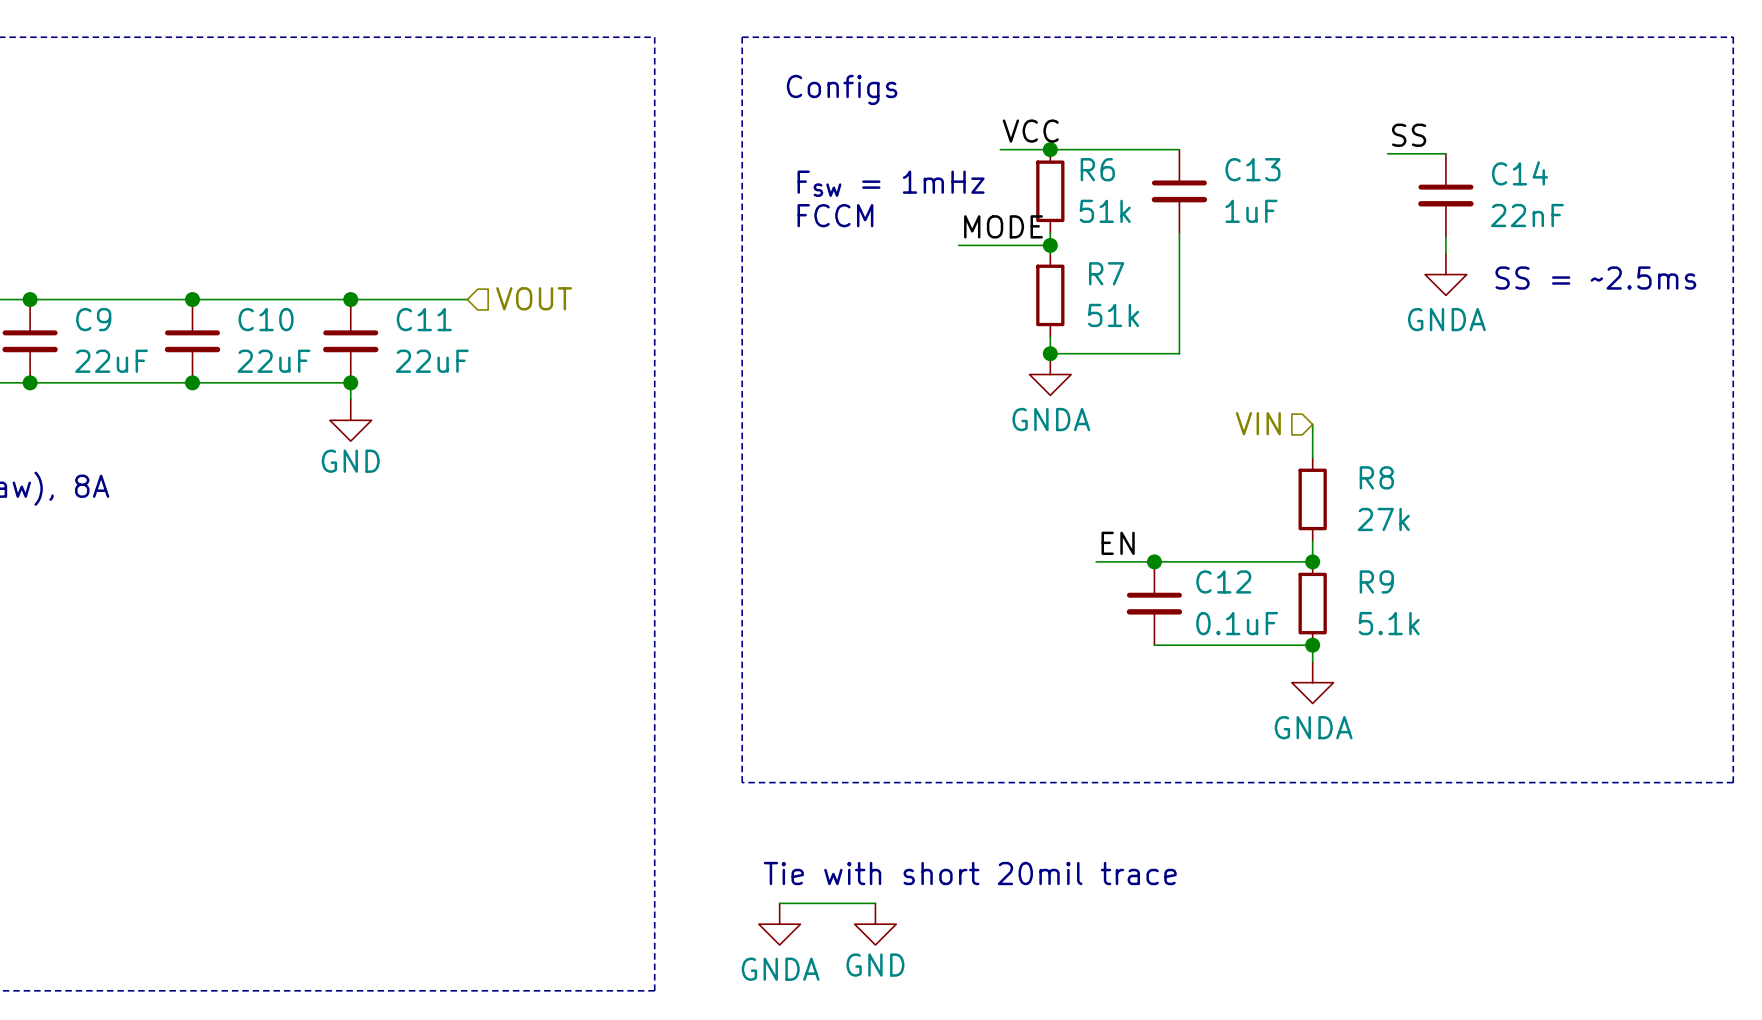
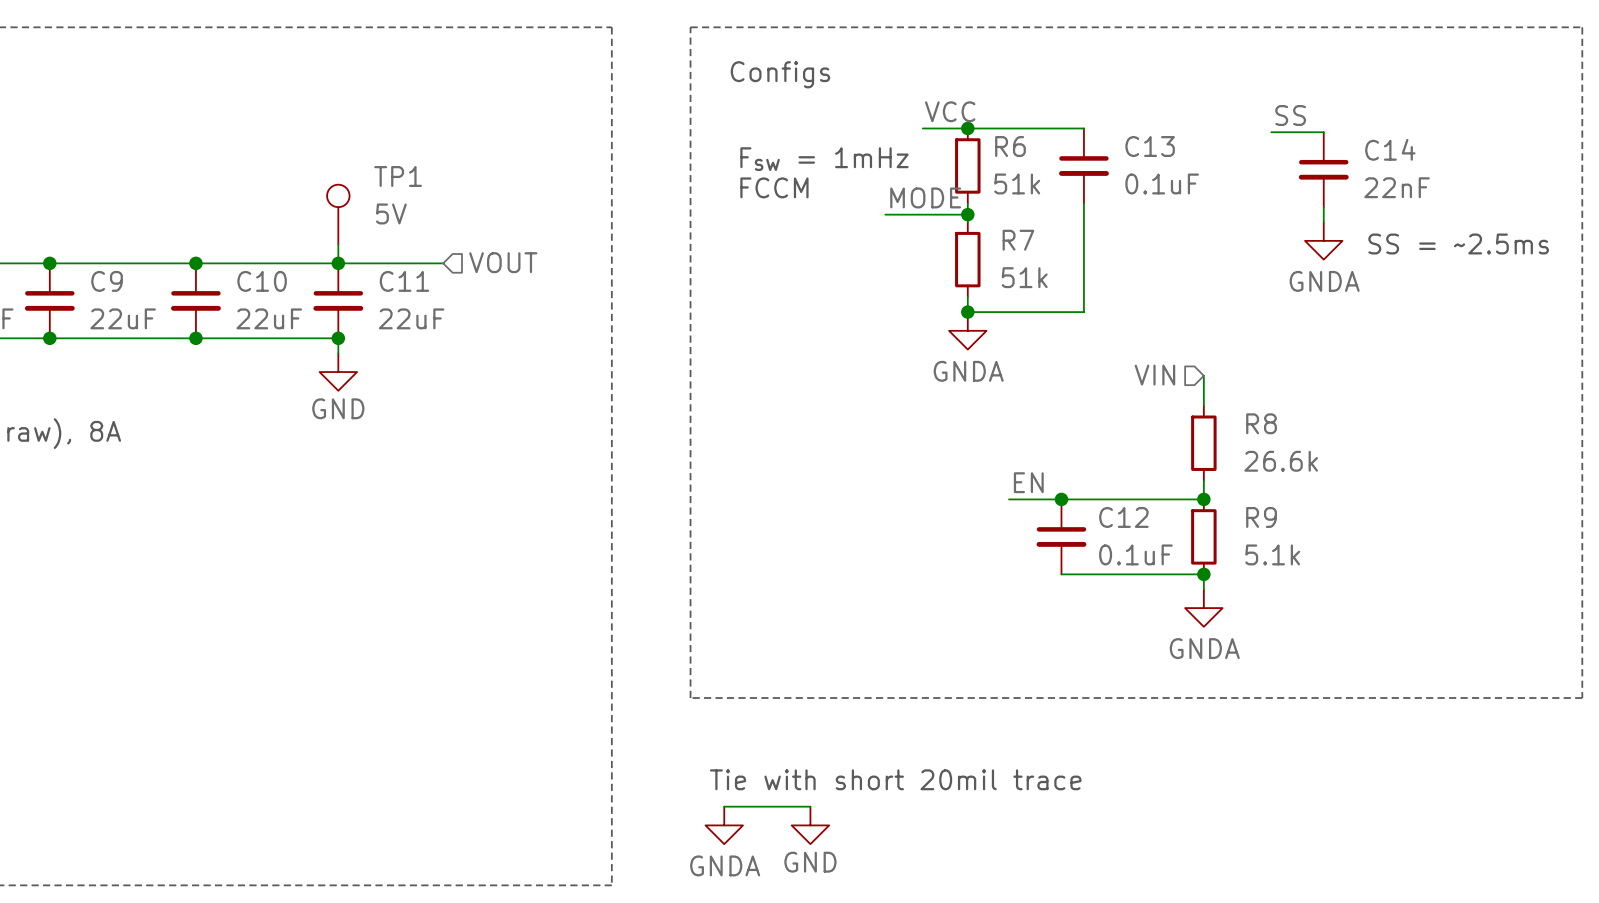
C13 value: 1uF (1251, 211) -> 0.1uF (1162, 183)
TP1: none -> 5V (338, 214)
wire: none -> (338, 244) (338, 263)
R8 value: 27k (1383, 519) -> 26.6k (1281, 461)

